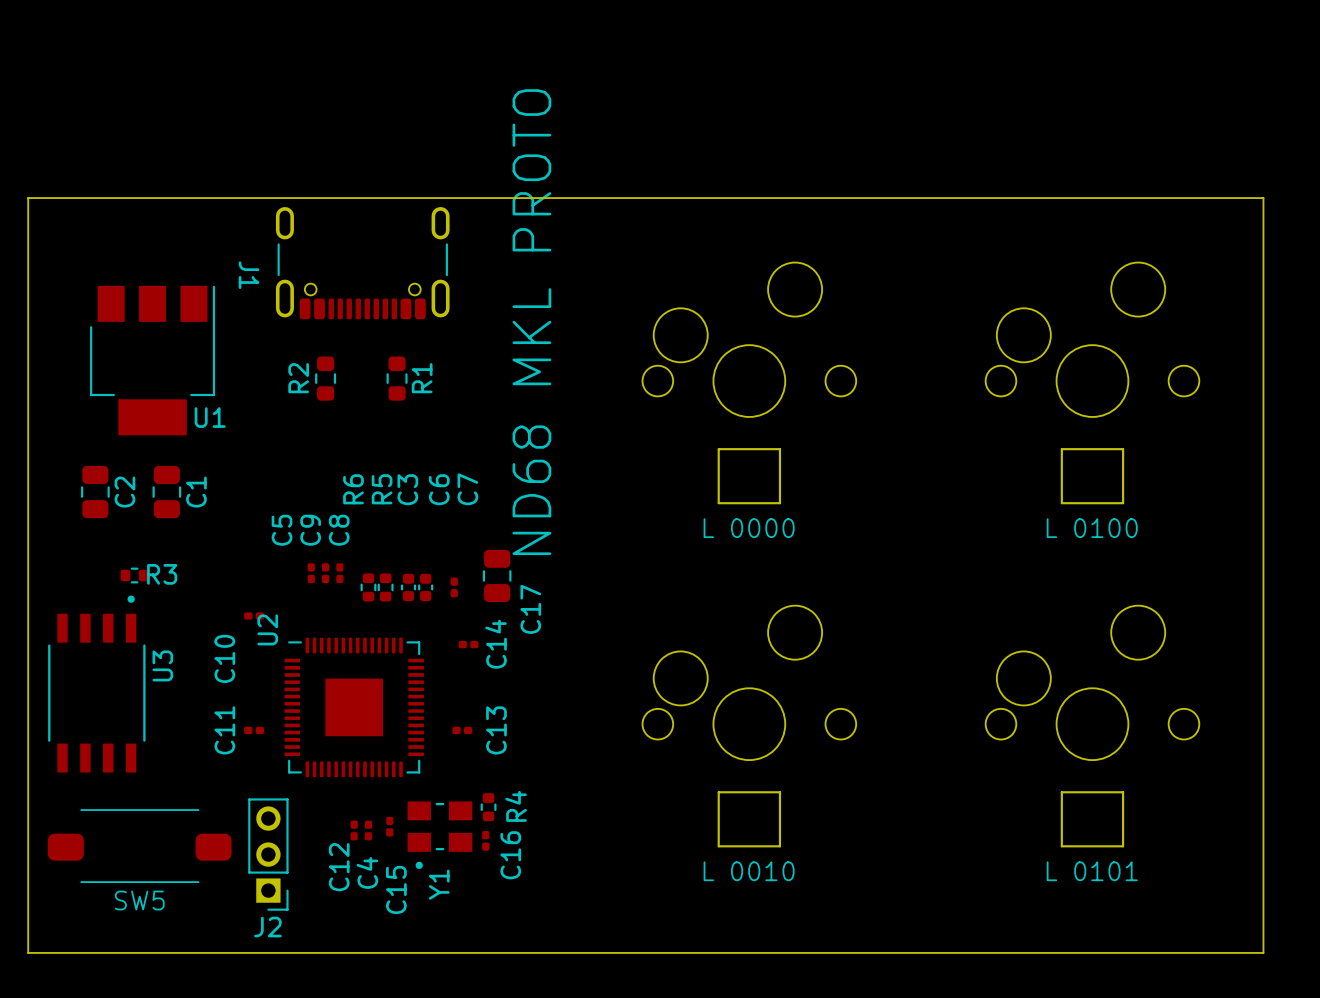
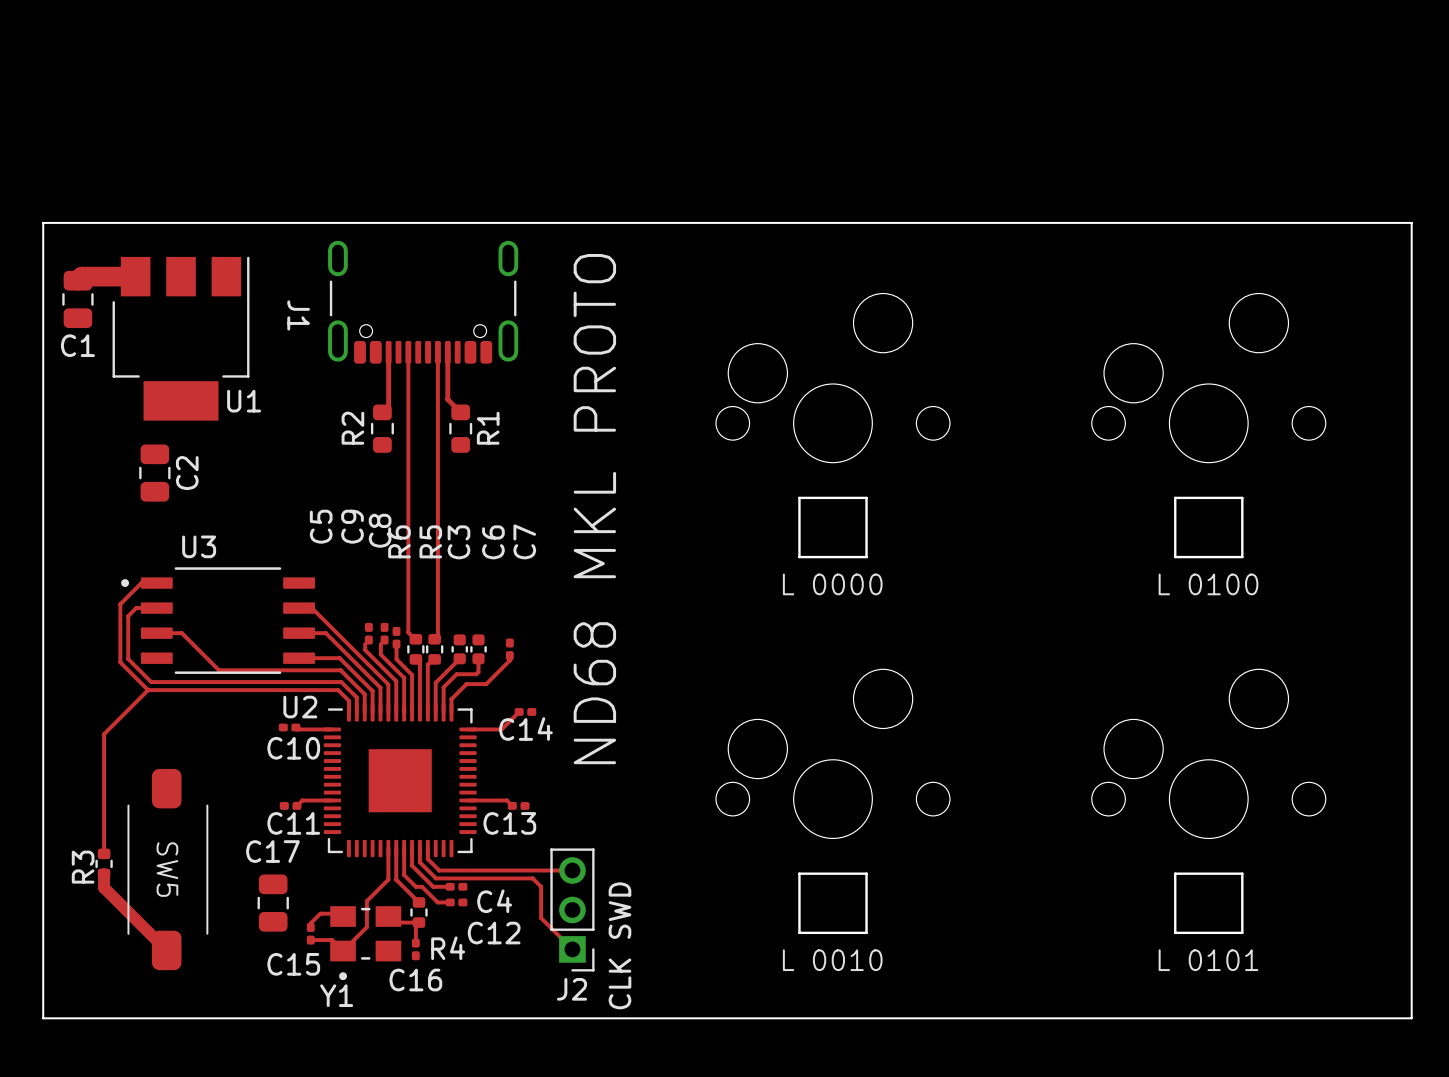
board edge: (1263, 198) (1263, 952) (28, 952) (28, 924) -> (1396, 222) (1411, 222) (1411, 1018) (43, 1018)
track: none -> (135, 276) (82, 276) (77, 280)
J1 position: (362, 263) -> (423, 302)
track: none -> (388, 352) (388, 406) (382, 412)
track: none -> (408, 352) (408, 632) (414, 638)
track: none -> (437, 352) (437, 634) (433, 638)
track: none -> (447, 352) (447, 399) (460, 412)
text position: ND68 MKL PROTO (531, 322) -> ND68 MKL PROTO (594, 509)
U1 position: (152, 360) -> (181, 338)
R2 position: (325, 378) -> (382, 428)
R1 position: (397, 378) -> (460, 428)
C2 position: (95, 492) -> (154, 473)
C1 position: (166, 492) -> (77, 299)
C1 name rotation: 0° (196, 492) -> 90° clockwise (77, 345)
C1 name position: C1 (196, 492) -> C1 (77, 345)
track: none -> (156, 583) (141, 583) (120, 604) (120, 662) (148, 690)
C9 name: C9 (310, 530) -> C5 (321, 526)
C8 name: C8 (339, 530) -> C9 (352, 526)
track: none -> (156, 608) (136, 608) (128, 616) (128, 659) (151, 682) (341, 682) (356, 697) (356, 712)
track: none -> (299, 608) (311, 608) (388, 684) (388, 712)
track: none -> (156, 633) (181, 633) (218, 670) (340, 670) (364, 694) (364, 712)
track: none -> (299, 633) (325, 633) (380, 687) (380, 712)
C5: (311, 573) -> none
R3 rotation: 0° (134, 575) -> 90° clockwise (104, 863)
R3 position: (134, 575) -> (104, 863)
C17 position: (497, 575) -> (273, 903)
C8: none -> (396, 637)
track: none -> (365, 644) (365, 650) (396, 681) (396, 712)
track: none -> (380, 644) (380, 654) (404, 677) (404, 712)
track: none -> (396, 644) (396, 659) (412, 674) (412, 712)
track: none -> (509, 655) (509, 660) (486, 684) (466, 684) (451, 699) (451, 712)
track: none -> (299, 658) (339, 658) (372, 691) (372, 712)
track: none -> (414, 659) (419, 664) (419, 712)
track: none -> (433, 659) (427, 664) (427, 712)
track: none -> (459, 658) (435, 682) (435, 712)
track: none -> (478, 658) (478, 672) (476, 674) (456, 674) (443, 687) (443, 712)
C17 name rotation: 0° (530, 609) -> 90° clockwise (272, 851)
C17 name position: C17 (530, 609) -> C17 (272, 851)
C10 position: (254, 616) -> (289, 727)
track: none -> (148, 690) (104, 734) (104, 853)
track: none -> (148, 690) (338, 690) (348, 700) (348, 712)
U2 name rotation: 0° (267, 629) -> 90° clockwise (300, 707)
track: none -> (519, 711) (501, 729) (468, 729)
C14 name rotation: 0° (496, 644) -> 90° clockwise (525, 729)
C10 name rotation: 0° (224, 658) -> 90° clockwise (293, 748)
track: none -> (295, 727) (297, 729) (332, 729)
U3 rotation: 0° (96, 684) -> 90° counterclockwise (218, 620)
U3 position: (96, 684) -> (218, 620)
track: none -> (332, 800) (302, 800) (296, 805)
track: none -> (468, 800) (506, 800) (512, 805)
C11 name rotation: 0° (224, 730) -> 90° clockwise (293, 823)
C13 name rotation: 0° (496, 730) -> 90° clockwise (509, 823)
track: none -> (388, 848) (388, 879) (366, 901) (366, 927) (343, 951) (332, 940) (310, 940)
track: none -> (396, 848) (396, 879) (418, 902)
track: none -> (404, 848) (404, 875) (415, 886) (422, 886) (437, 902) (450, 902)
track: none -> (412, 848) (412, 865) (433, 886) (450, 886)
track: none -> (419, 848) (419, 862) (436, 878) (532, 878) (541, 886) (541, 918) (572, 949)
track: none -> (427, 848) (427, 859) (439, 870) (572, 870)
track: none -> (104, 874) (104, 887) (166, 950)
R4 name rotation: 0° (516, 806) -> 90° clockwise (448, 948)
R4 position: (488, 807) -> (418, 912)
C15 position: (389, 826) -> (310, 933)
C12 rotation: 0° (354, 830) -> 90° clockwise (456, 902)
C12 position: (354, 830) -> (456, 902)
C4 rotation: 0° (368, 830) -> 90° clockwise (456, 886)
C4 position: (368, 830) -> (456, 886)
track: none -> (343, 916) (340, 913) (320, 913) (310, 923) (310, 927)
track: none -> (388, 916) (394, 922) (418, 922) (415, 925) (415, 943)
Y1 position: (439, 835) -> (365, 943)
C16 position: (485, 840) -> (415, 949)
SW5 rotation: 0° (139, 846) -> 90° clockwise (167, 869)
J2 position: (268, 854) -> (572, 909)
C16 name rotation: 0° (510, 855) -> 90° clockwise (415, 980)
text: none -> CLK SWD (619, 945)
C12 name position: C12 (339, 867) -> C12 (494, 933)
C4 name position: C4 (367, 872) -> C4 (494, 901)
Y1 name rotation: 0° (439, 884) -> 90° clockwise (336, 995)
C15 name rotation: 0° (396, 890) -> 90° clockwise (293, 964)
SW5 name position: SW5 (139, 900) -> SW5 (167, 869)

